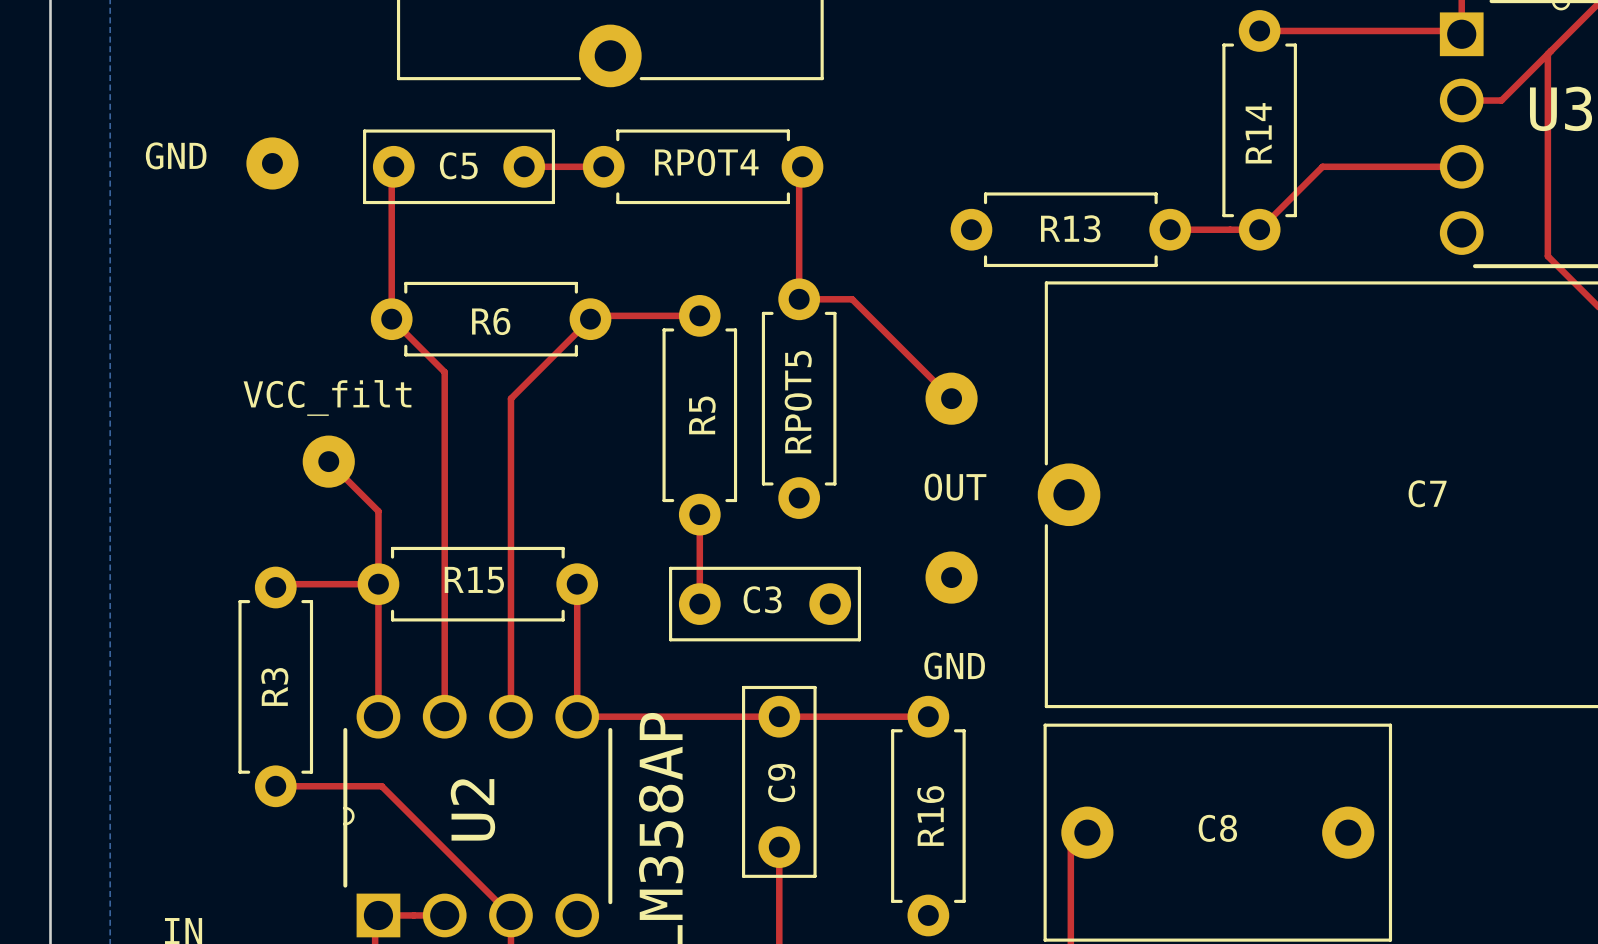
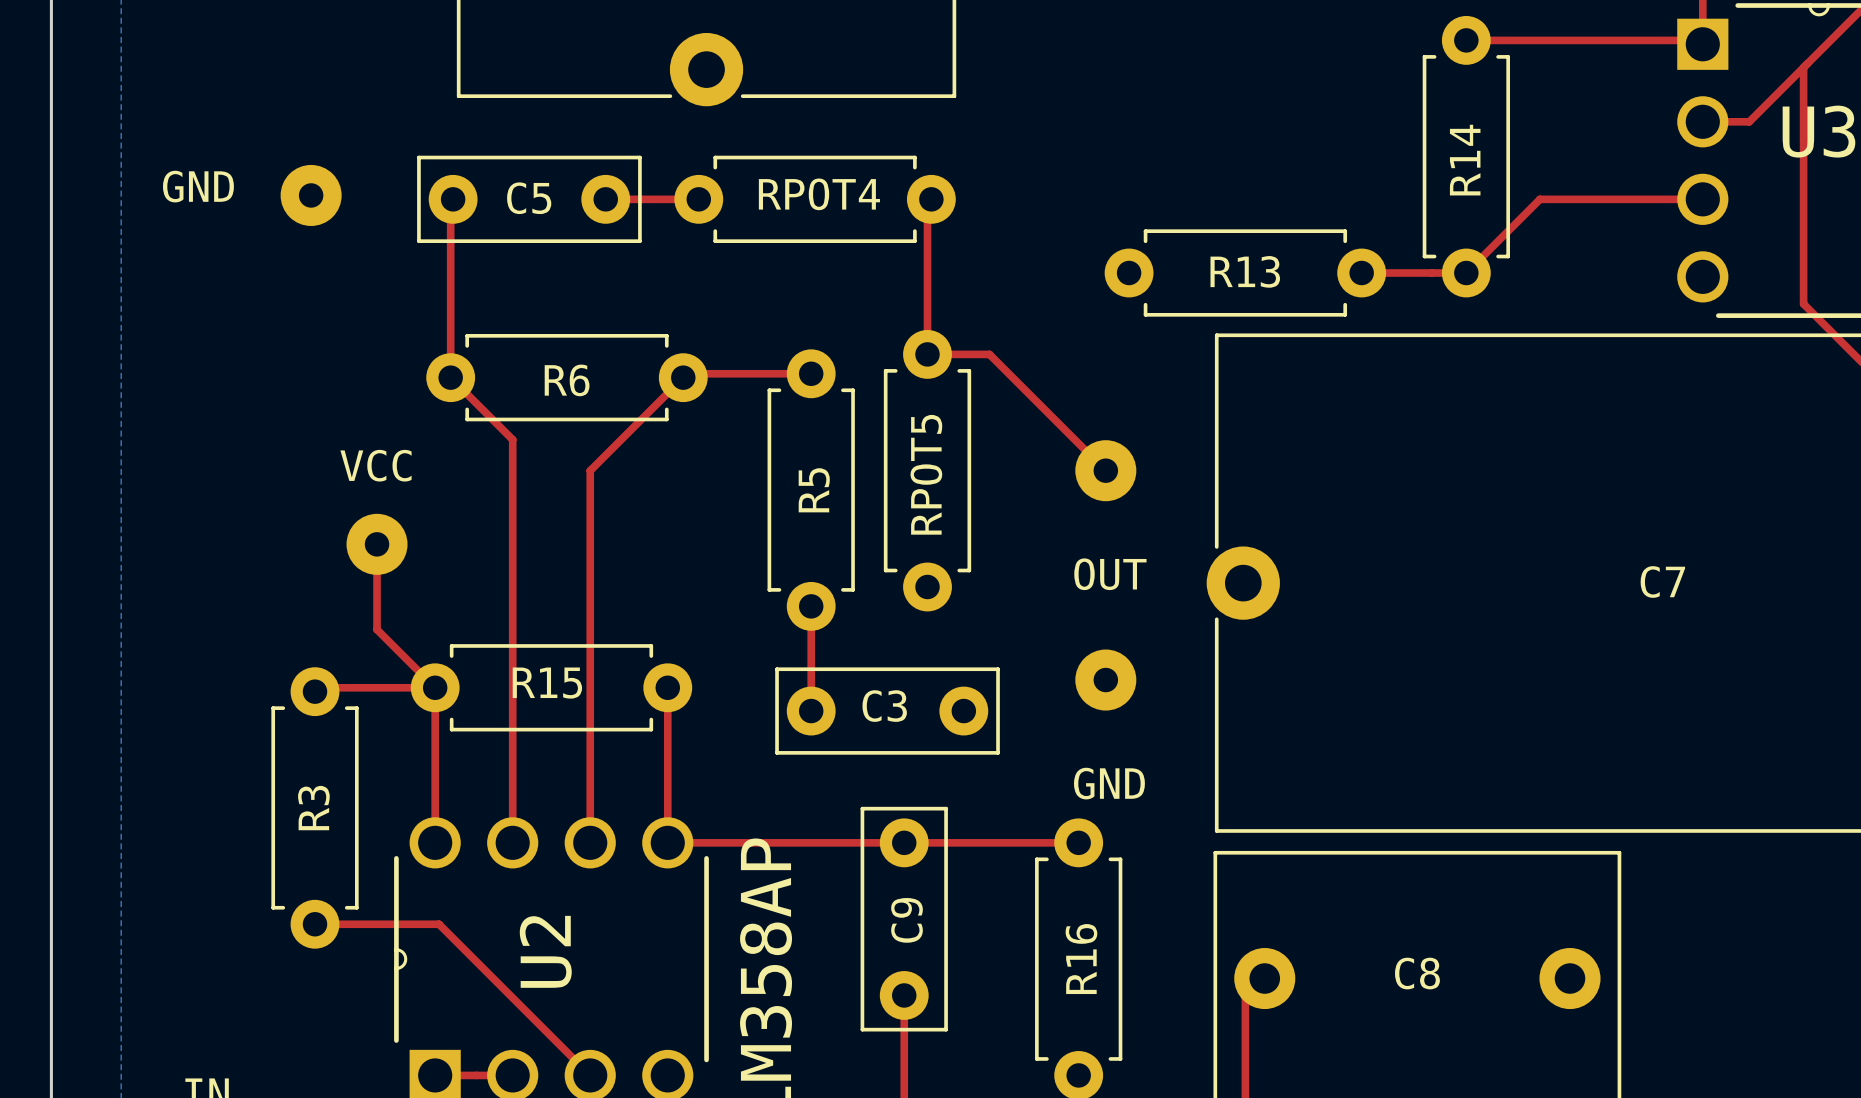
VCC_filt name: VCC_filt (327, 397) -> VCC (375, 465)
top track: (328, 461) (378, 511) (378, 584) -> (377, 544) (377, 629) (435, 687)

